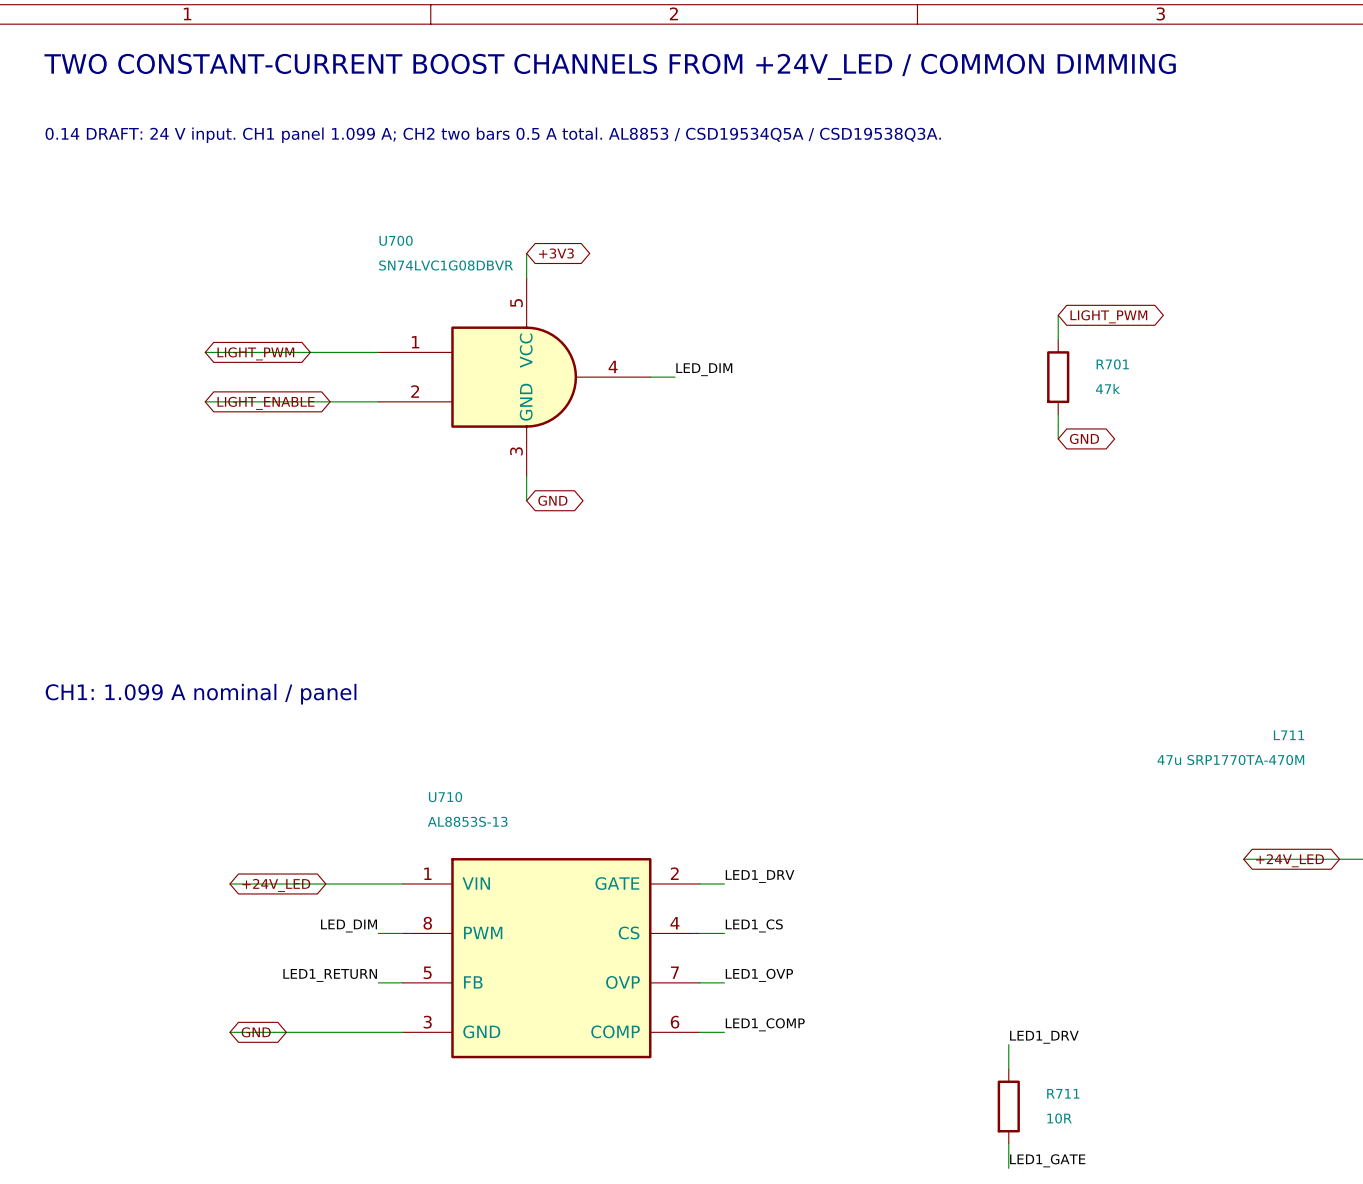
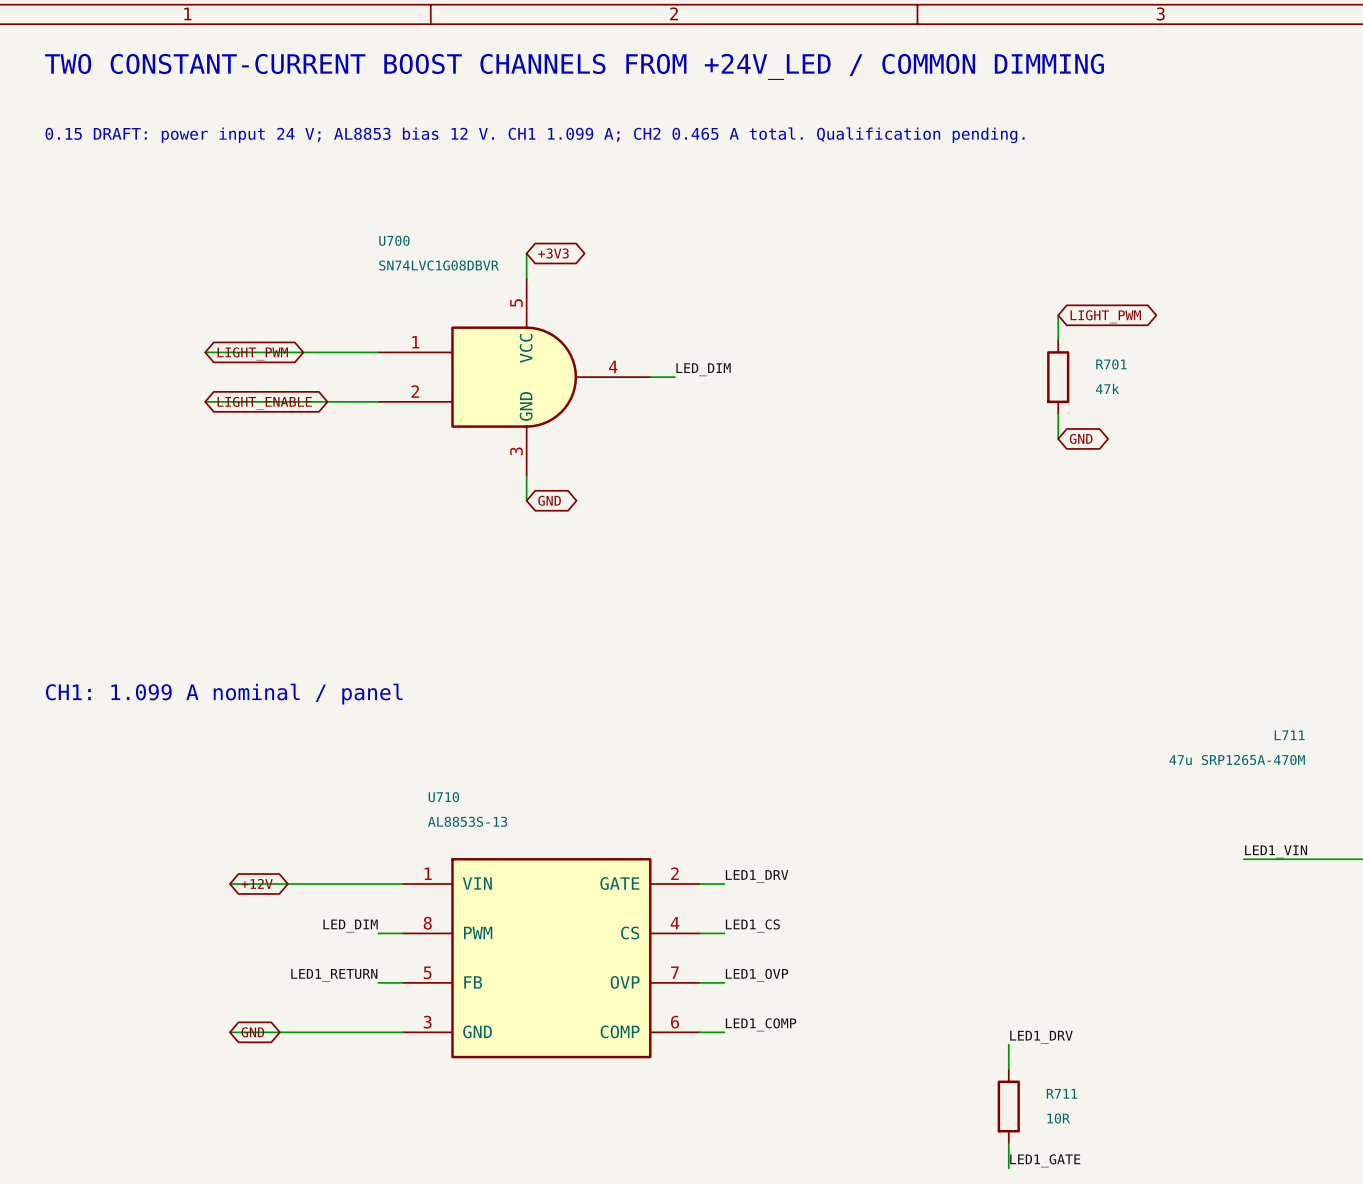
text: 0.14 DRAFT: 24 V input. CH1 panel 1.099 A; CH2 two bars 0.5 A total. AL8853 / CSD19534Q5A / CSD19538Q3A. (493, 135) -> 0.15 DRAFT: power input 24 V; AL8853 bias 12 V. CH1 1.099 A; CH2 0.465 A total. Qualification pending. (535, 135)
L711 value: 47u SRP1770TA-470M (1230, 760) -> 47u SRP1265A-470M (1237, 760)
label: none -> LED1_VIN (1276, 851)
global label: +24V_LED (1289, 860) -> none
global label: +24V_LED (276, 885) -> +12V (257, 883)

